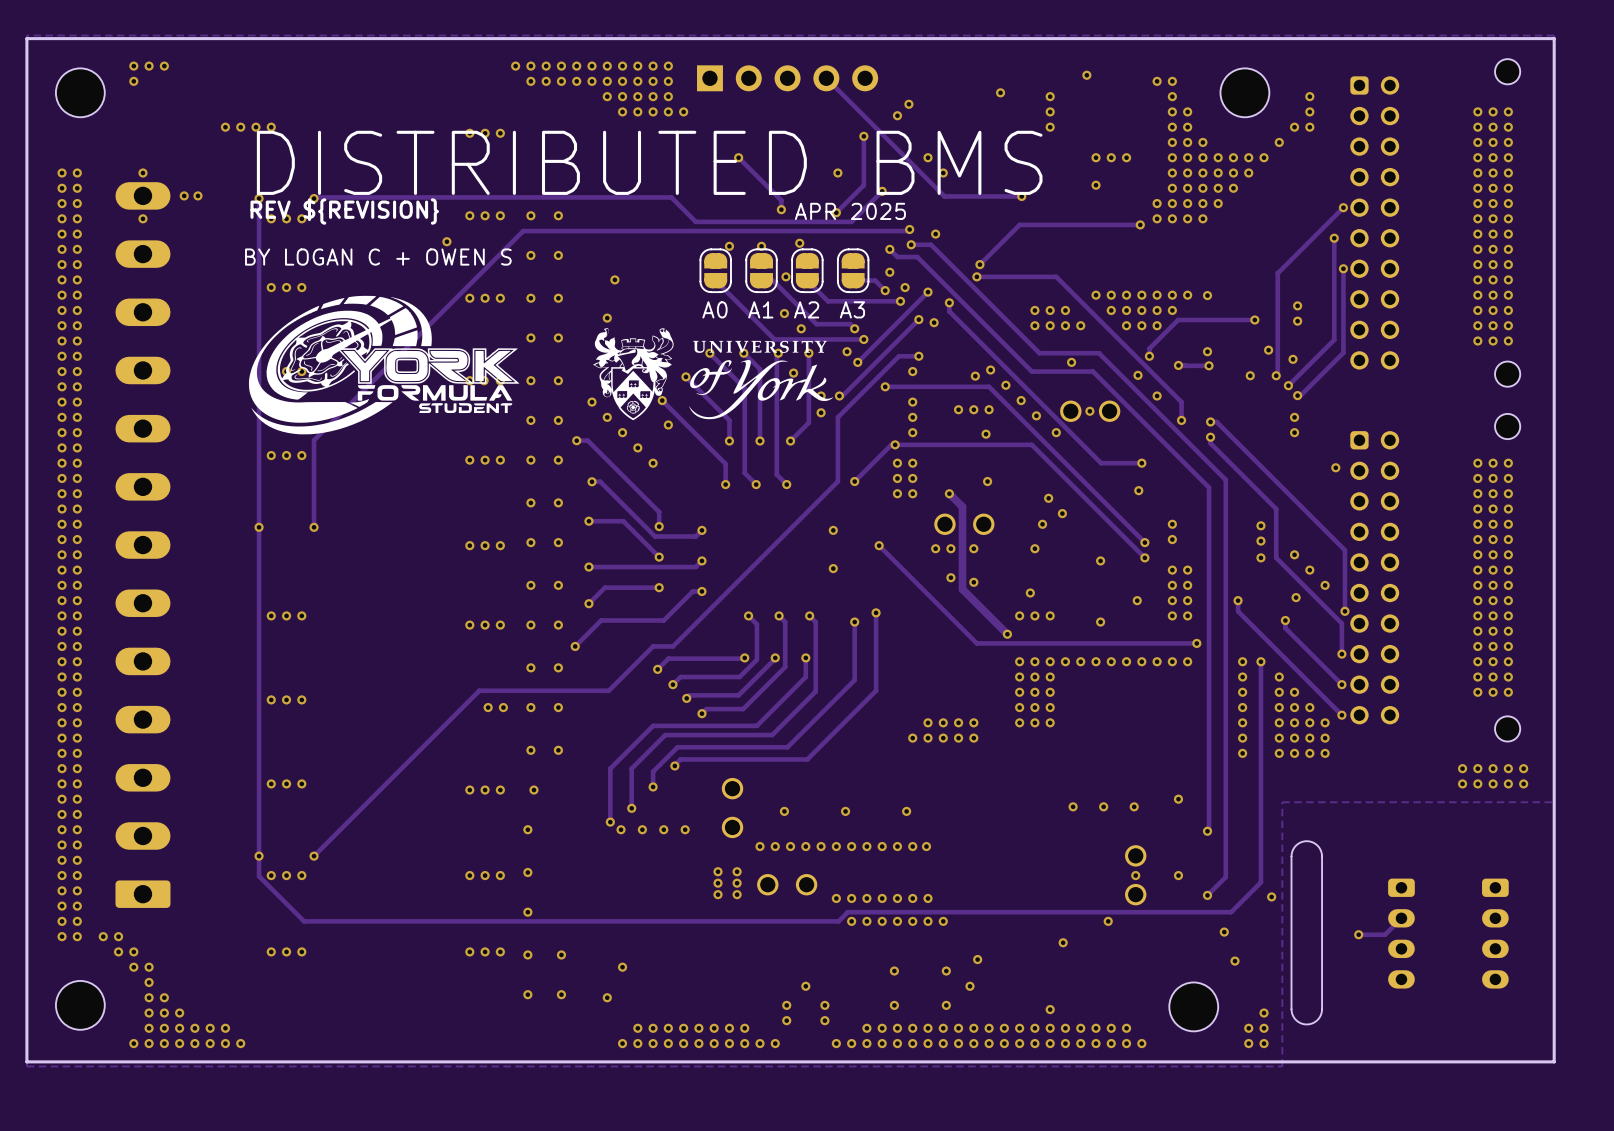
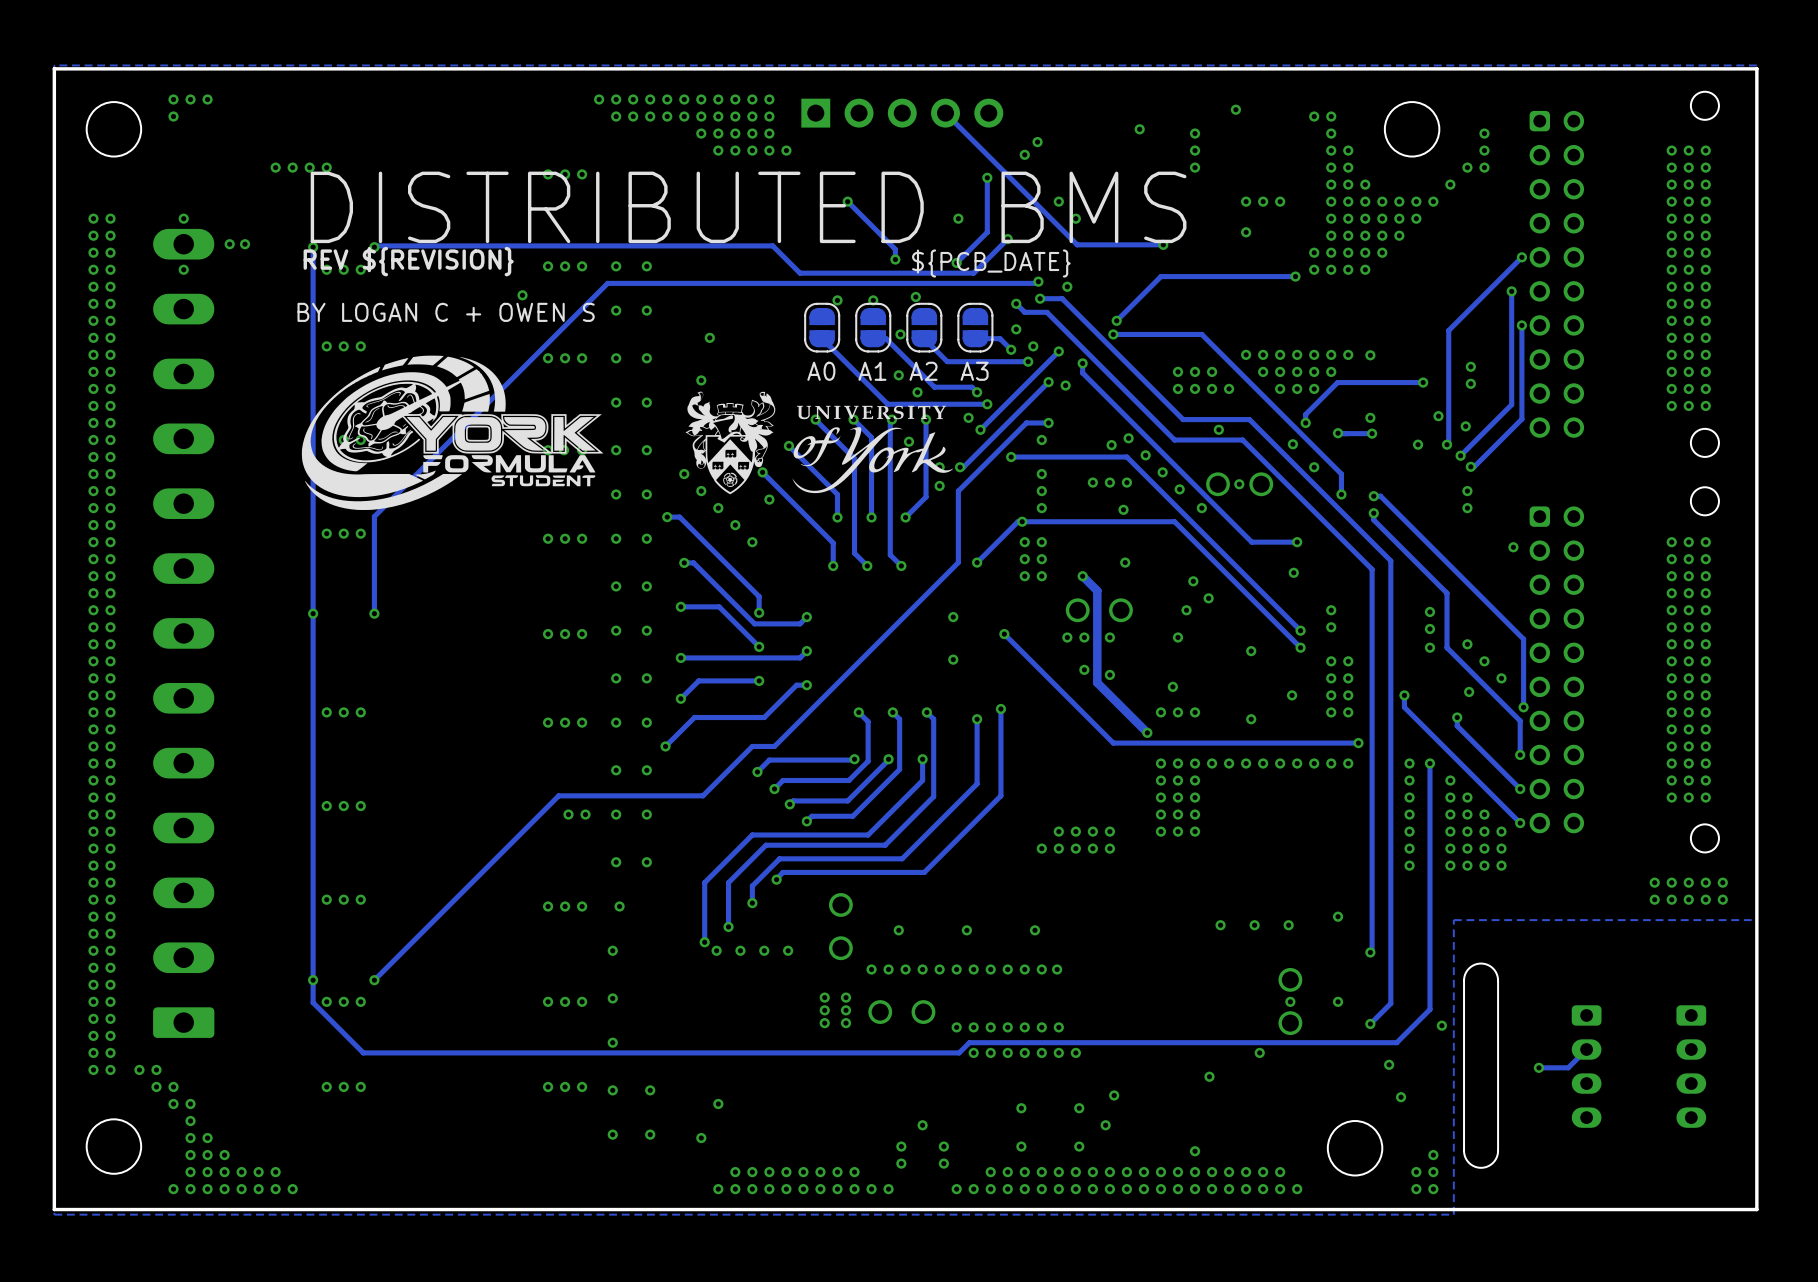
text: APR 2025 (850, 211) -> ${PCB_DATE} (991, 263)

